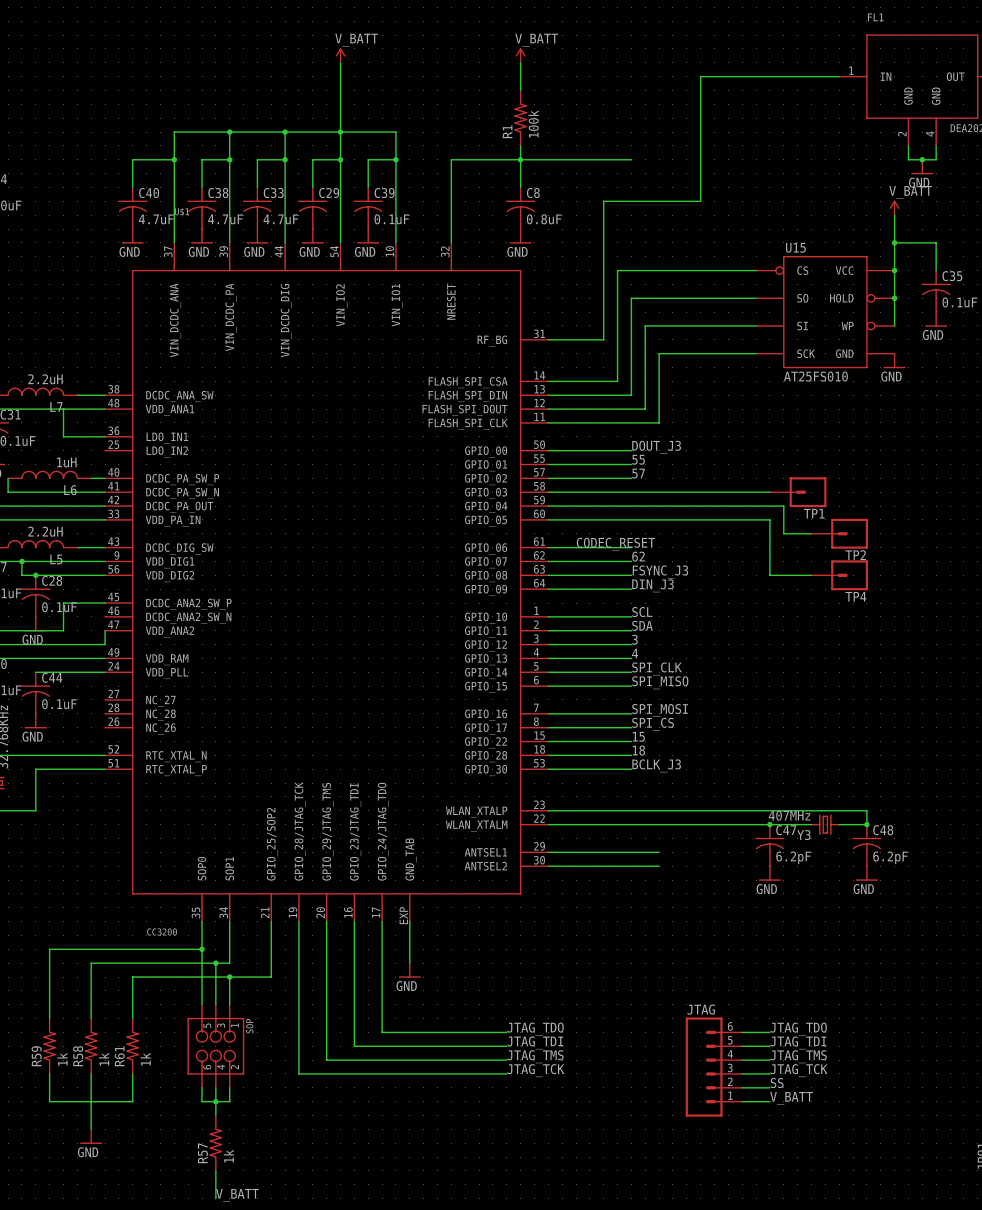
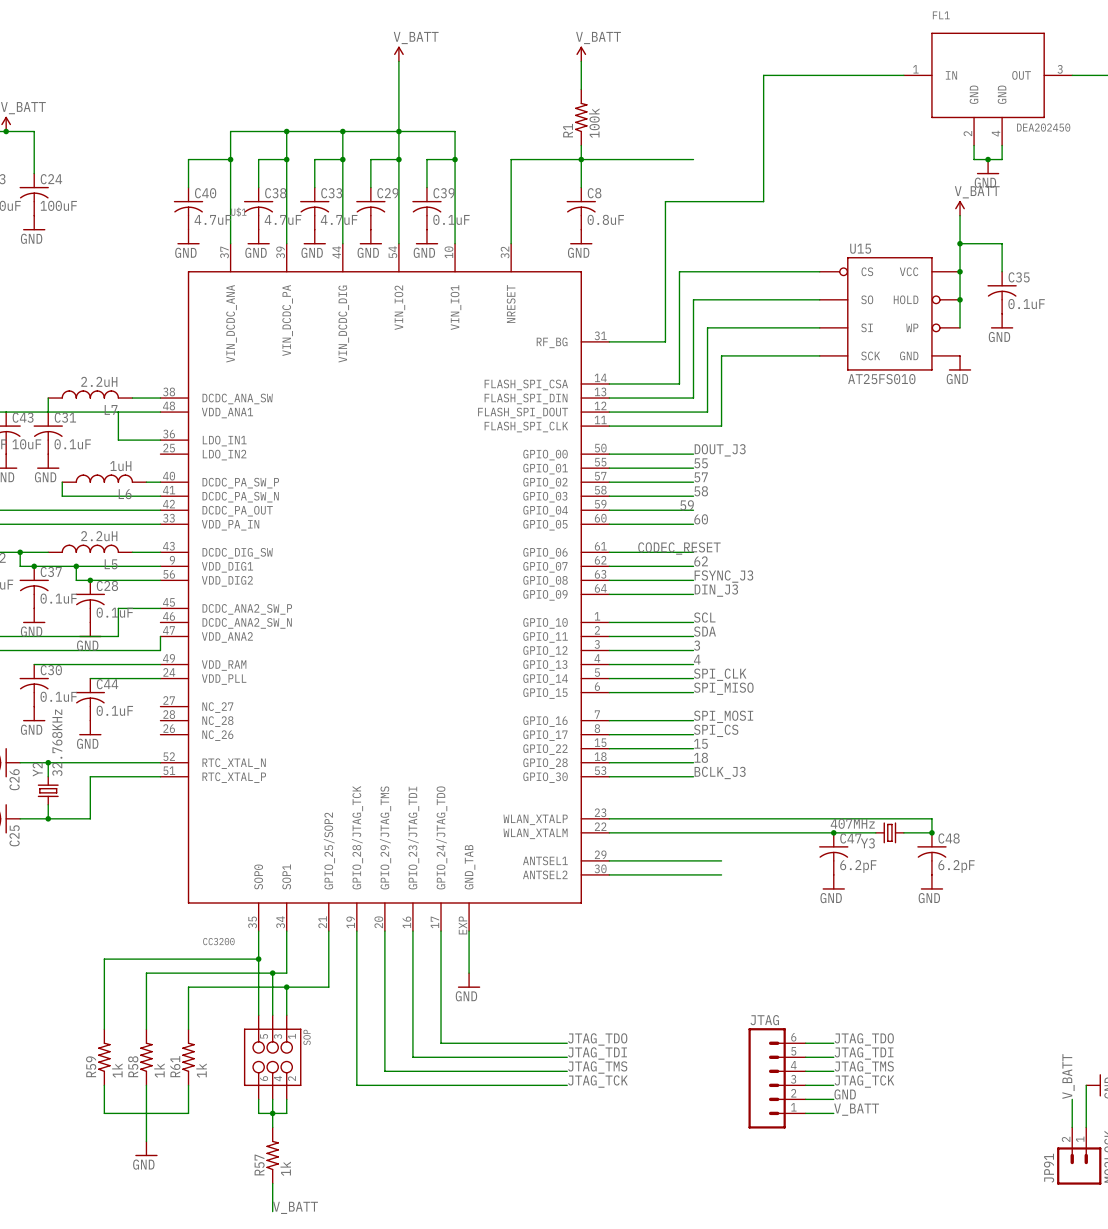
label: none -> 58 (701, 491)
wire: (631, 492) (769, 492) -> none
TP1: (798, 492) -> none
label: none -> 59 (687, 505)
wire: (631, 506) (783, 506) (783, 533) (811, 533) -> none
label: none -> 60 (701, 519)
wire: (631, 519) (769, 519) (769, 575) (811, 575) -> none
TP2: (839, 533) -> none
TP4: (839, 575) -> none
label: SS (777, 1082) -> GND (845, 1094)

